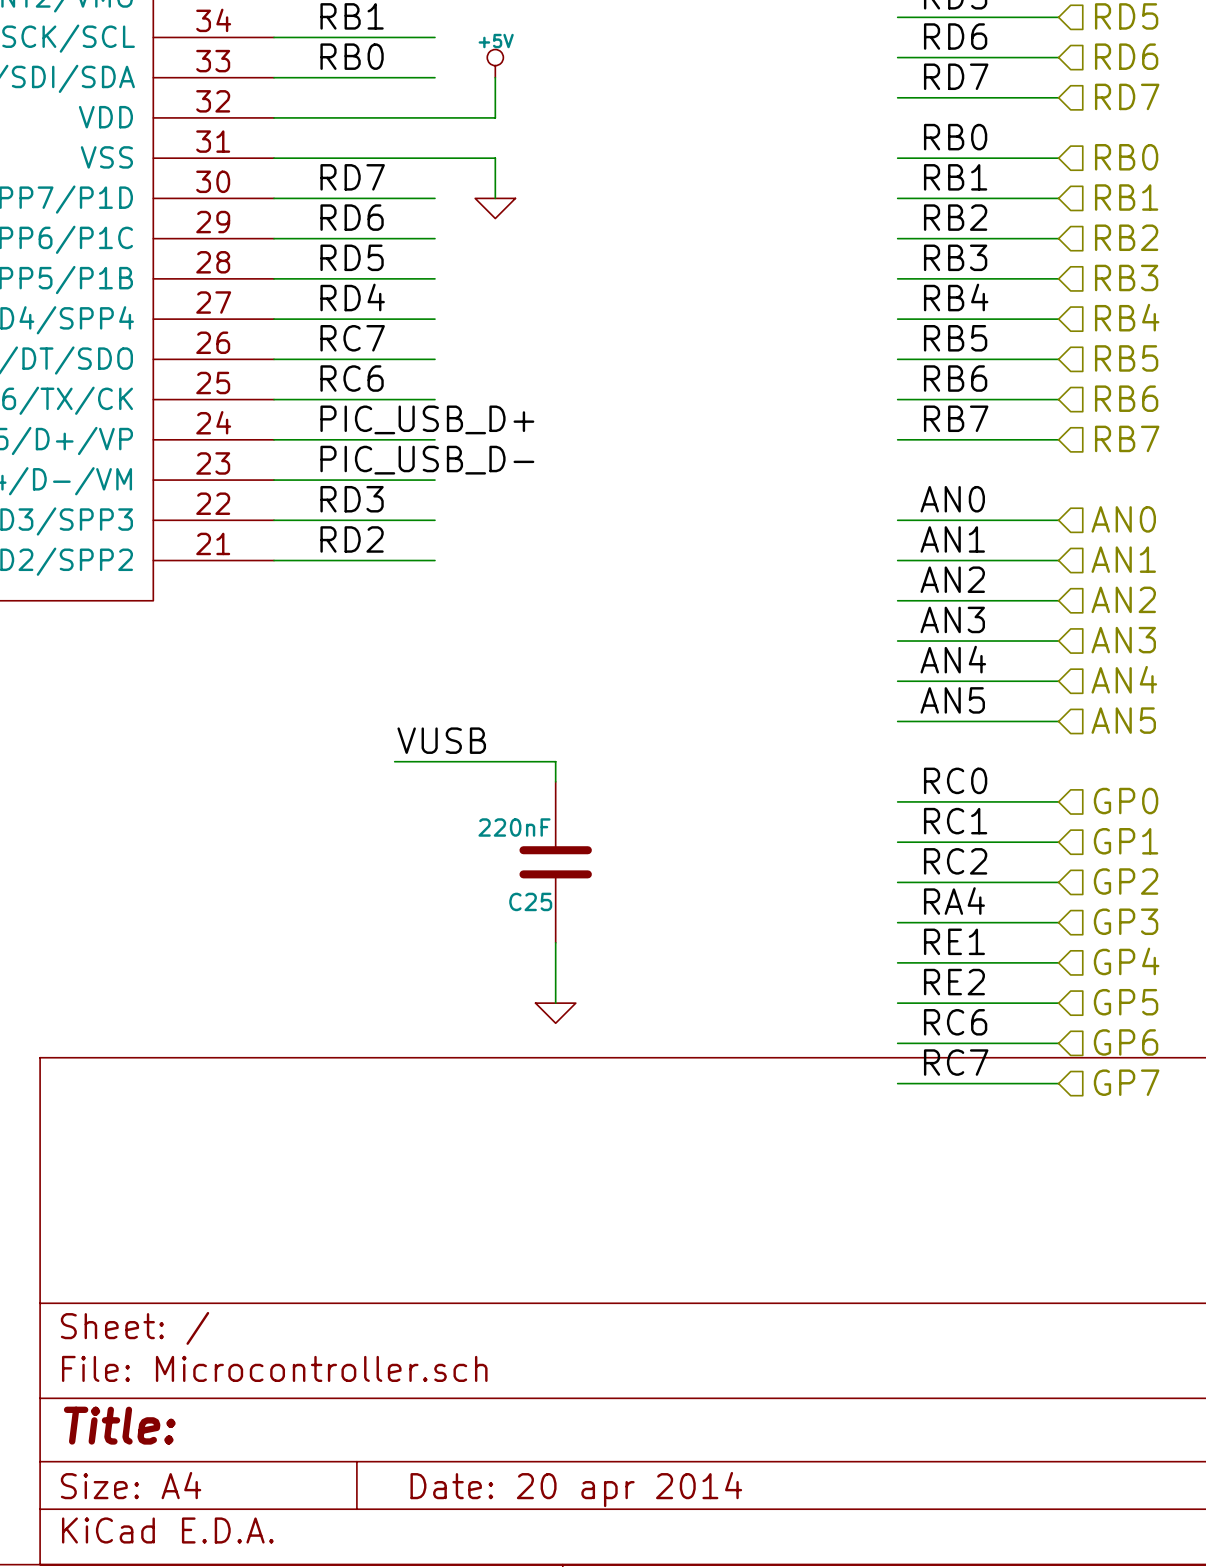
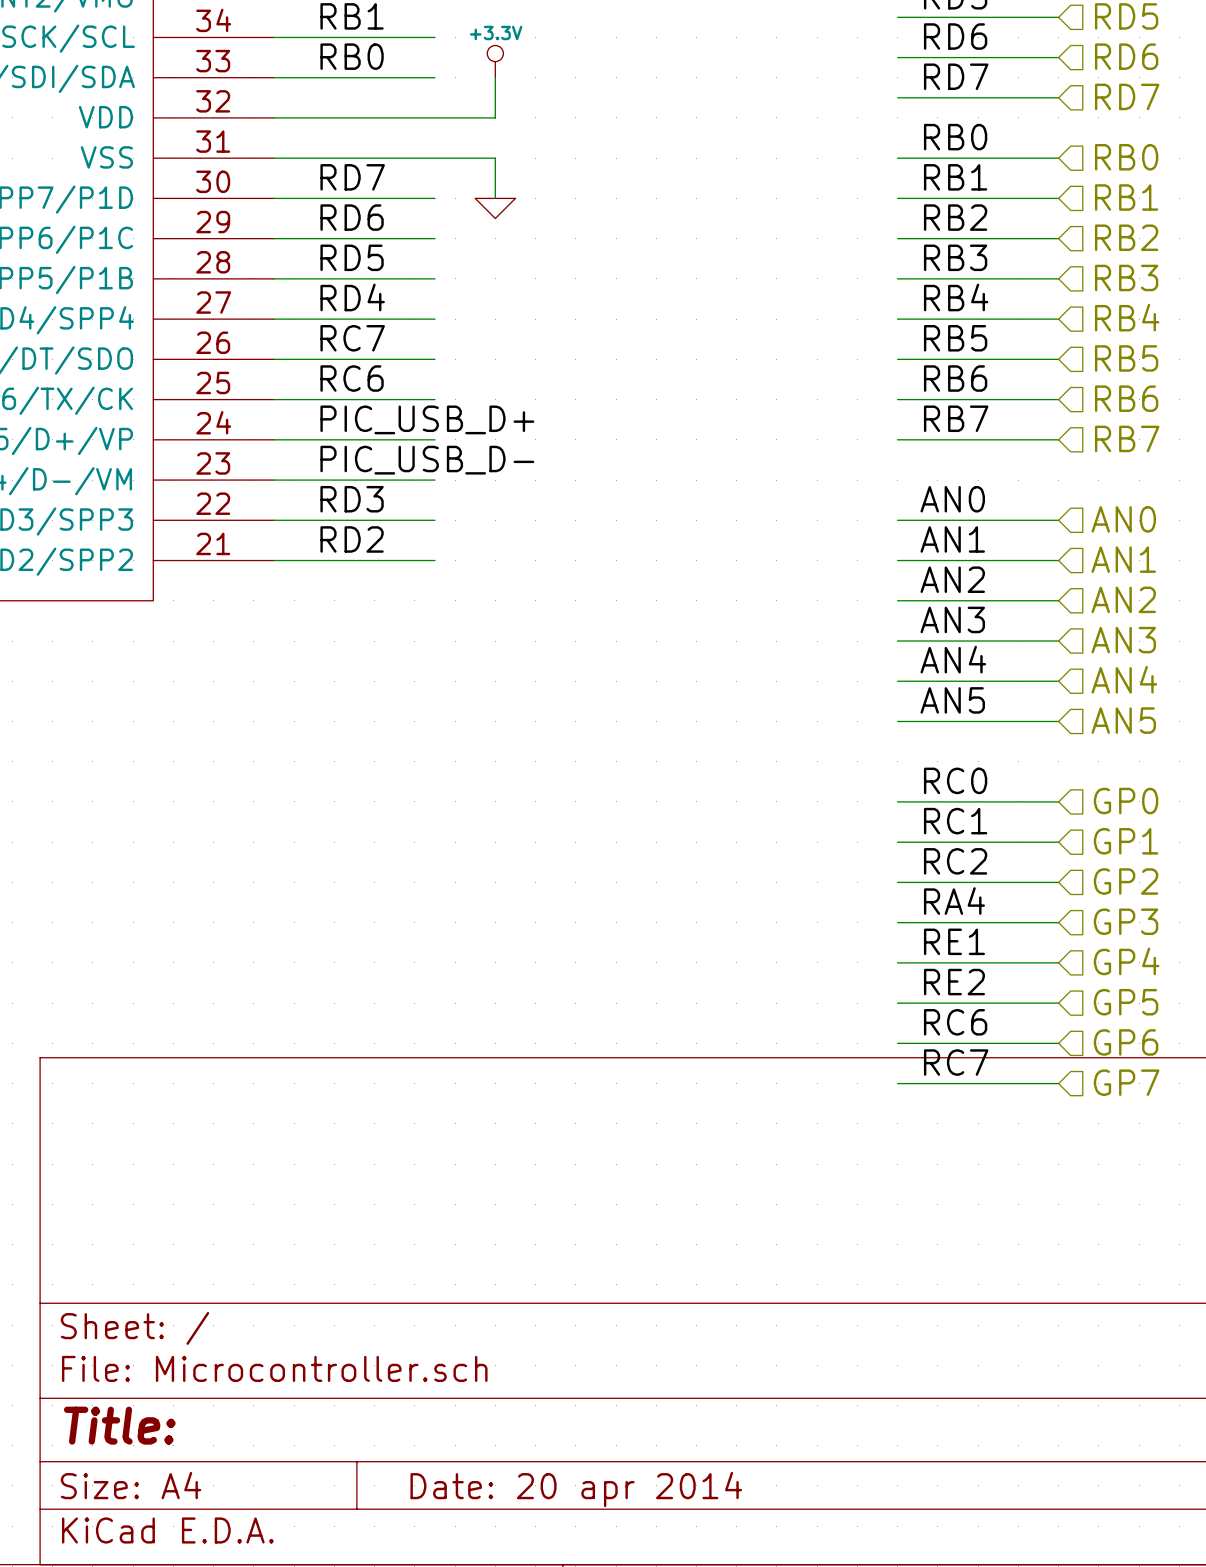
power symbol: +5V (495, 63) -> +3.3V (495, 61)
label: VUSB (441, 740) -> none
wire: (394, 761) (555, 761) (555, 781) -> none
C25: 220nF (555, 862) -> none
wire: (555, 942) (555, 1003) -> none
power symbol: (555, 1013) -> none

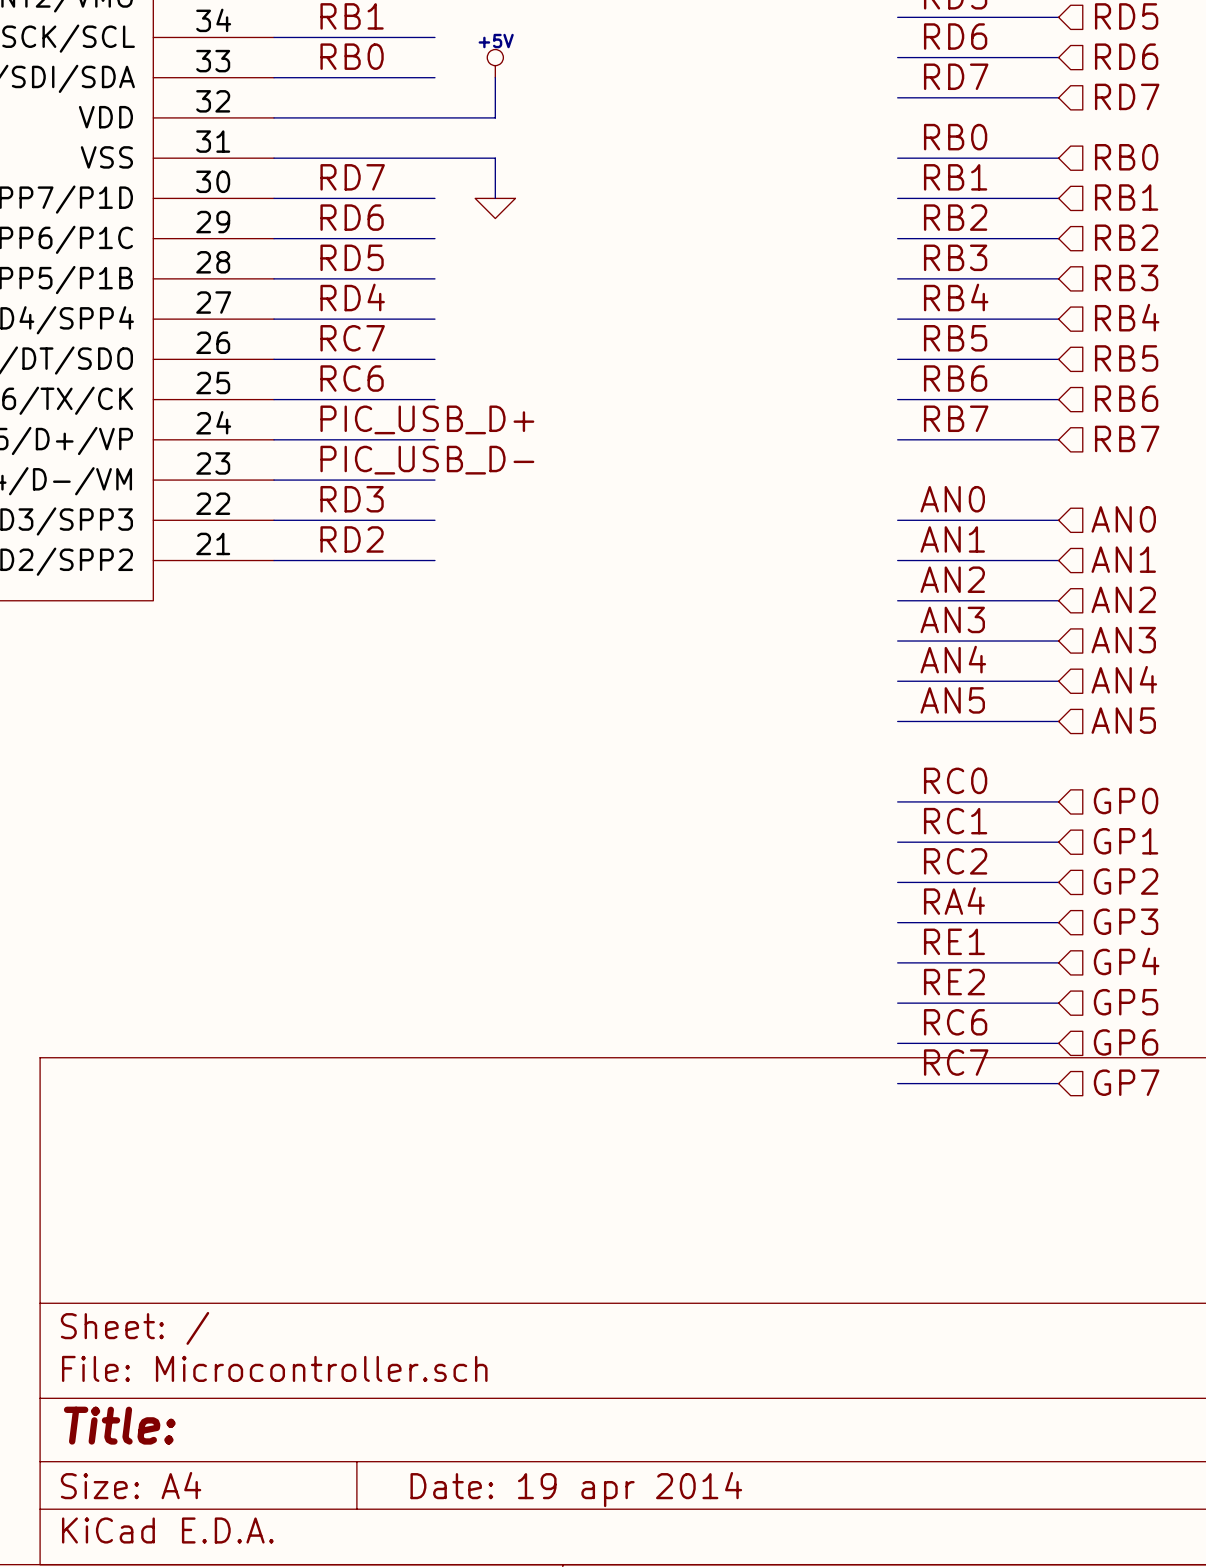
power symbol: +3.3V (495, 61) -> +5V (495, 63)
title block: Date: 20 apr 2014 (576, 1489) -> Date: 19 apr 2014 (576, 1489)

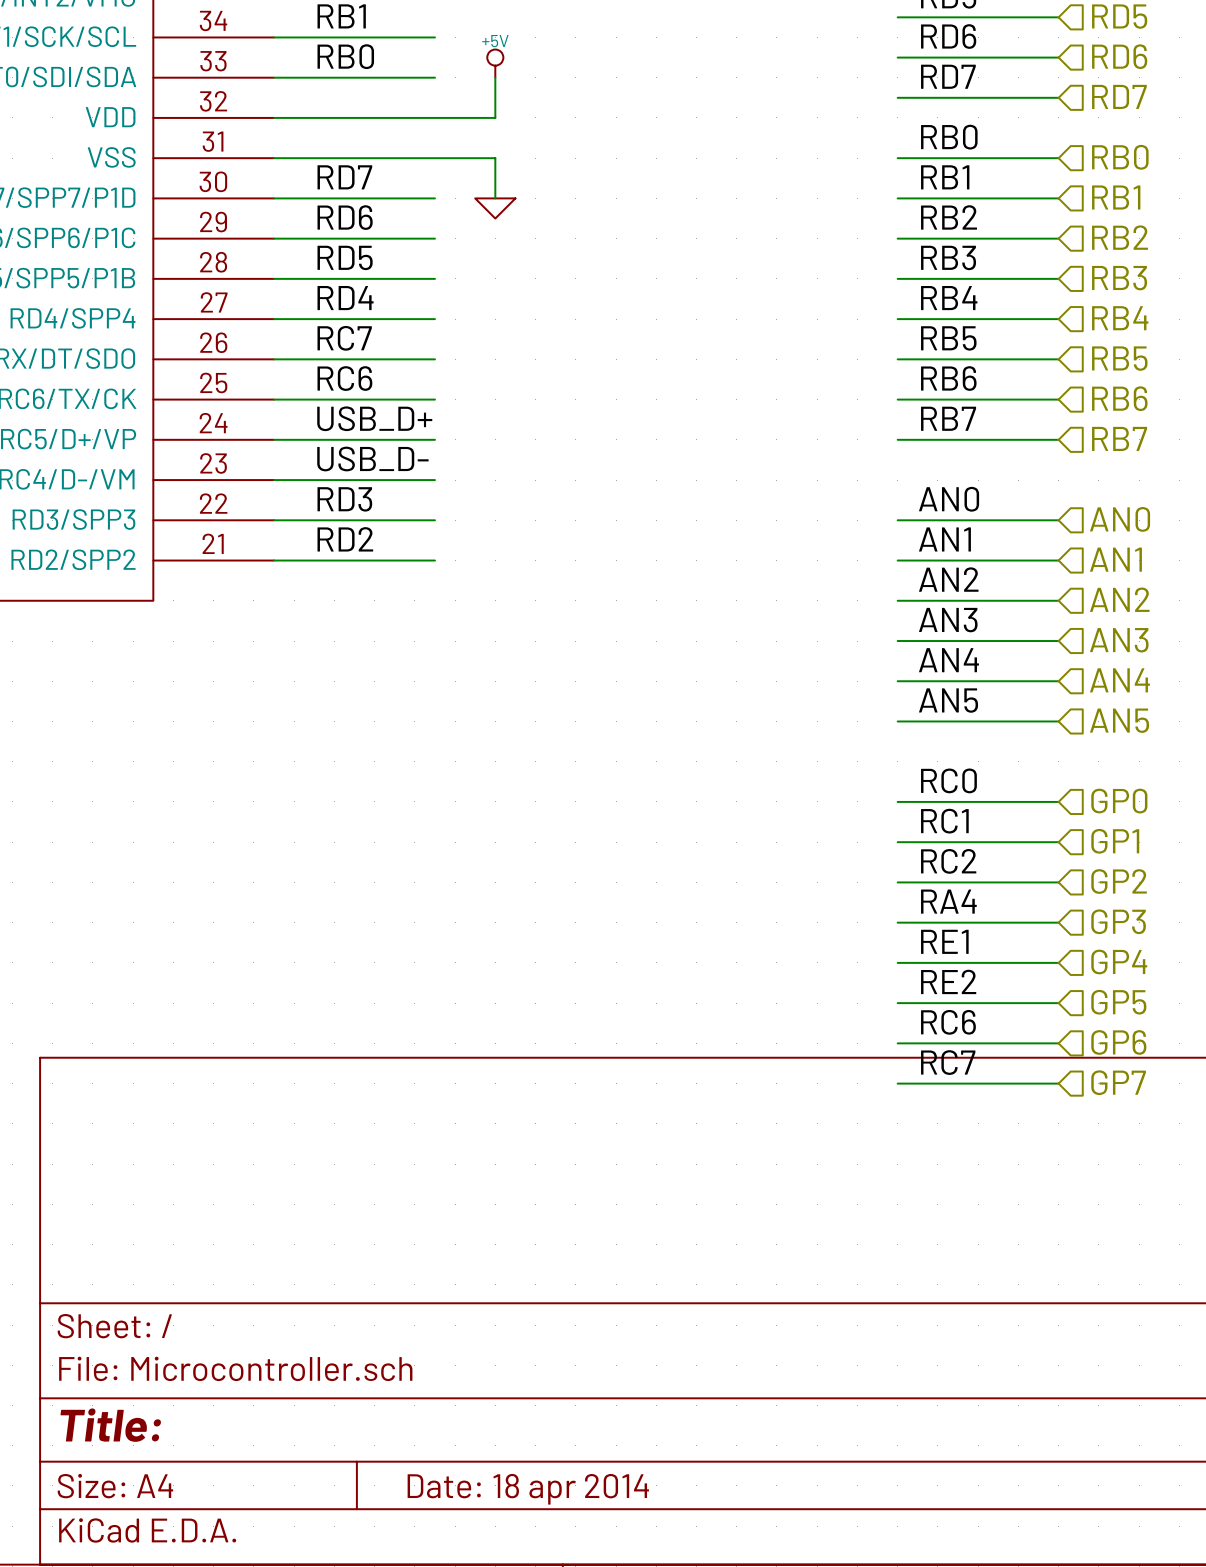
label: PIC_USB_D+ (427, 419) -> USB_D+ (374, 418)
label: PIC_USB_D- (427, 460) -> USB_D- (372, 459)
title block: Date: 19 apr 2014 (576, 1489) -> Date: 18 apr 2014 (528, 1489)

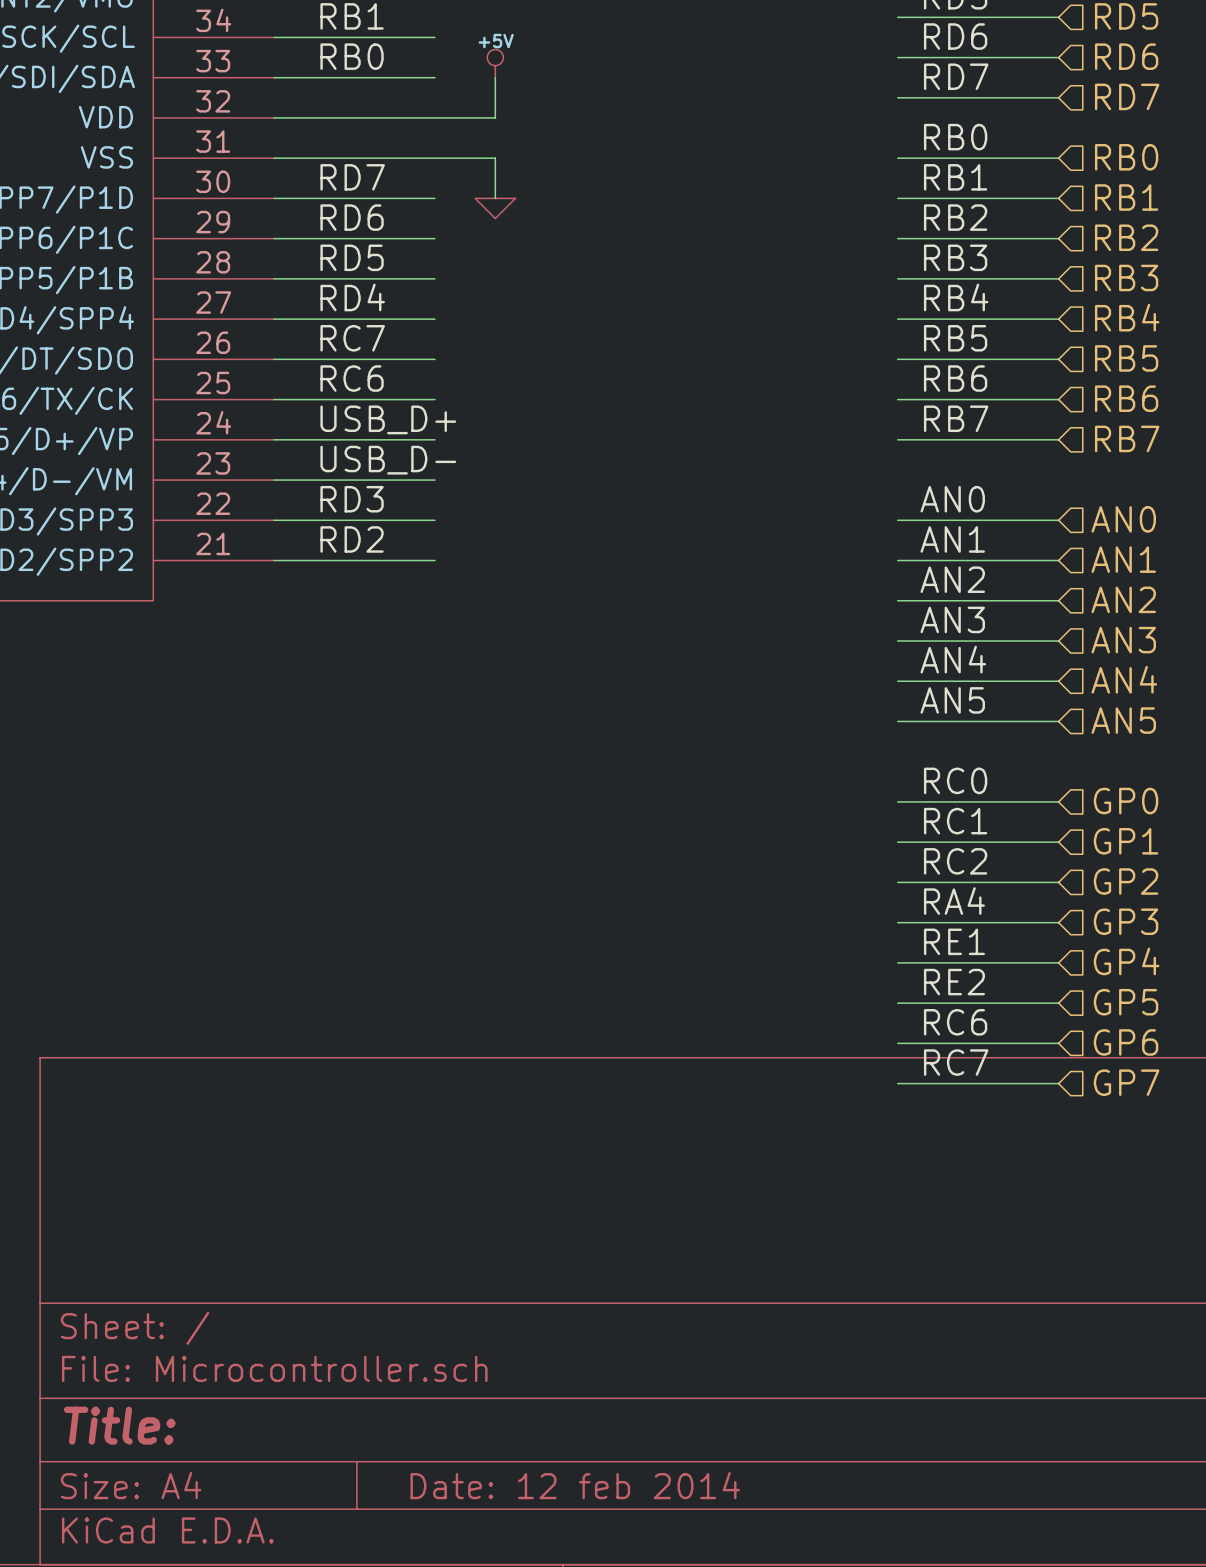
title block: Date: 18 apr 2014 (528, 1489) -> Date: 12 feb 2014 (575, 1485)

